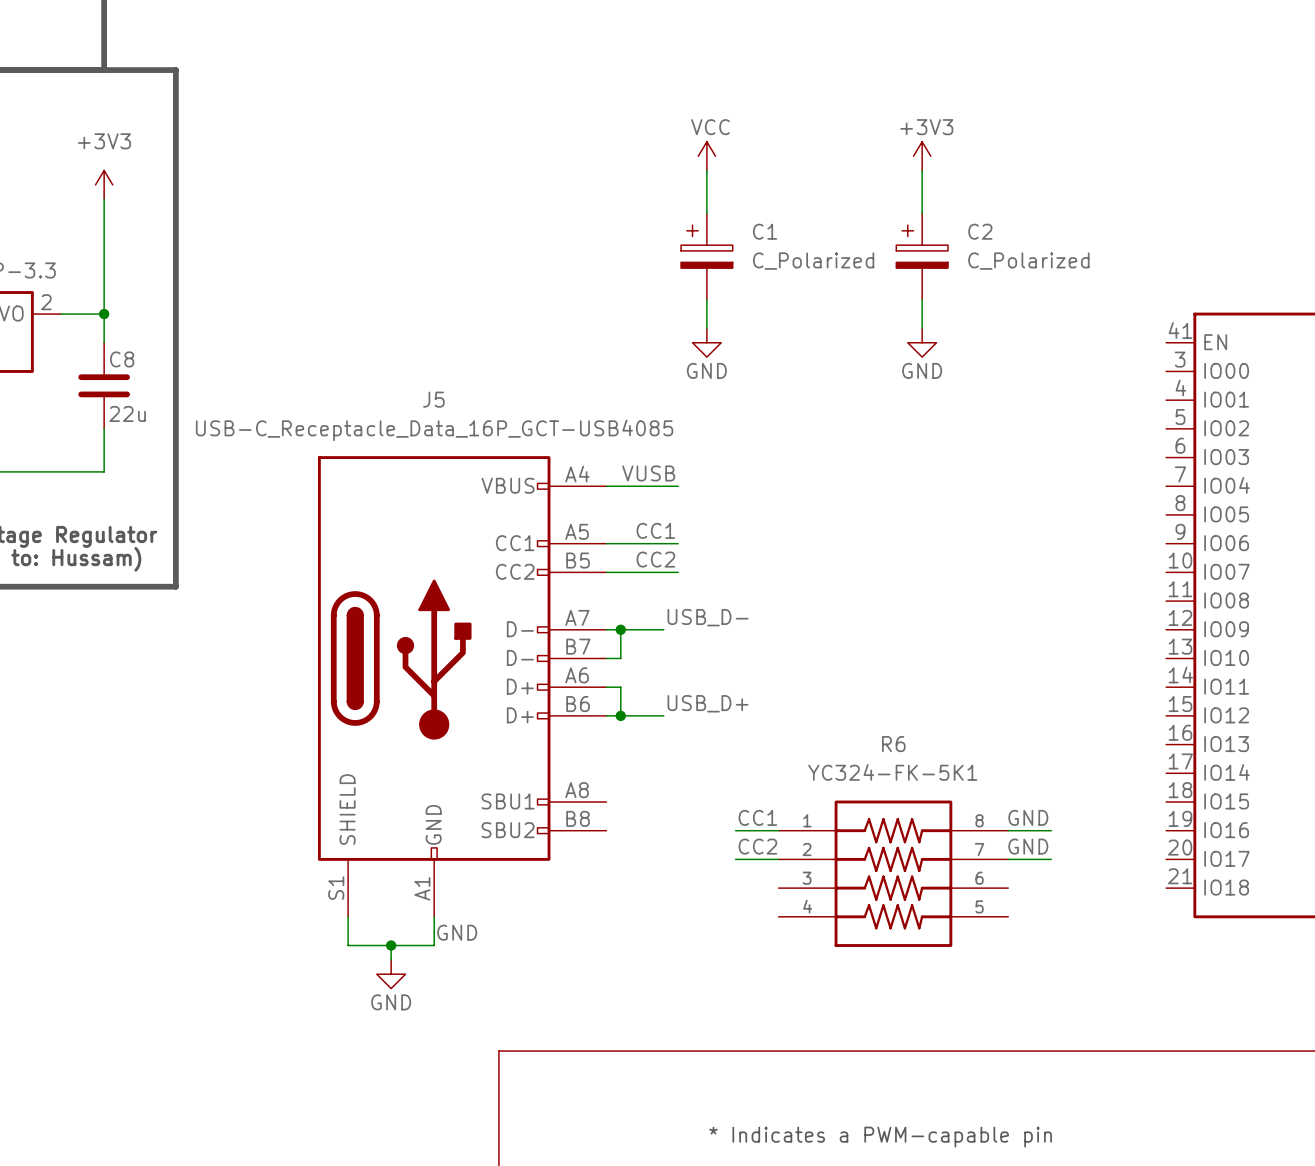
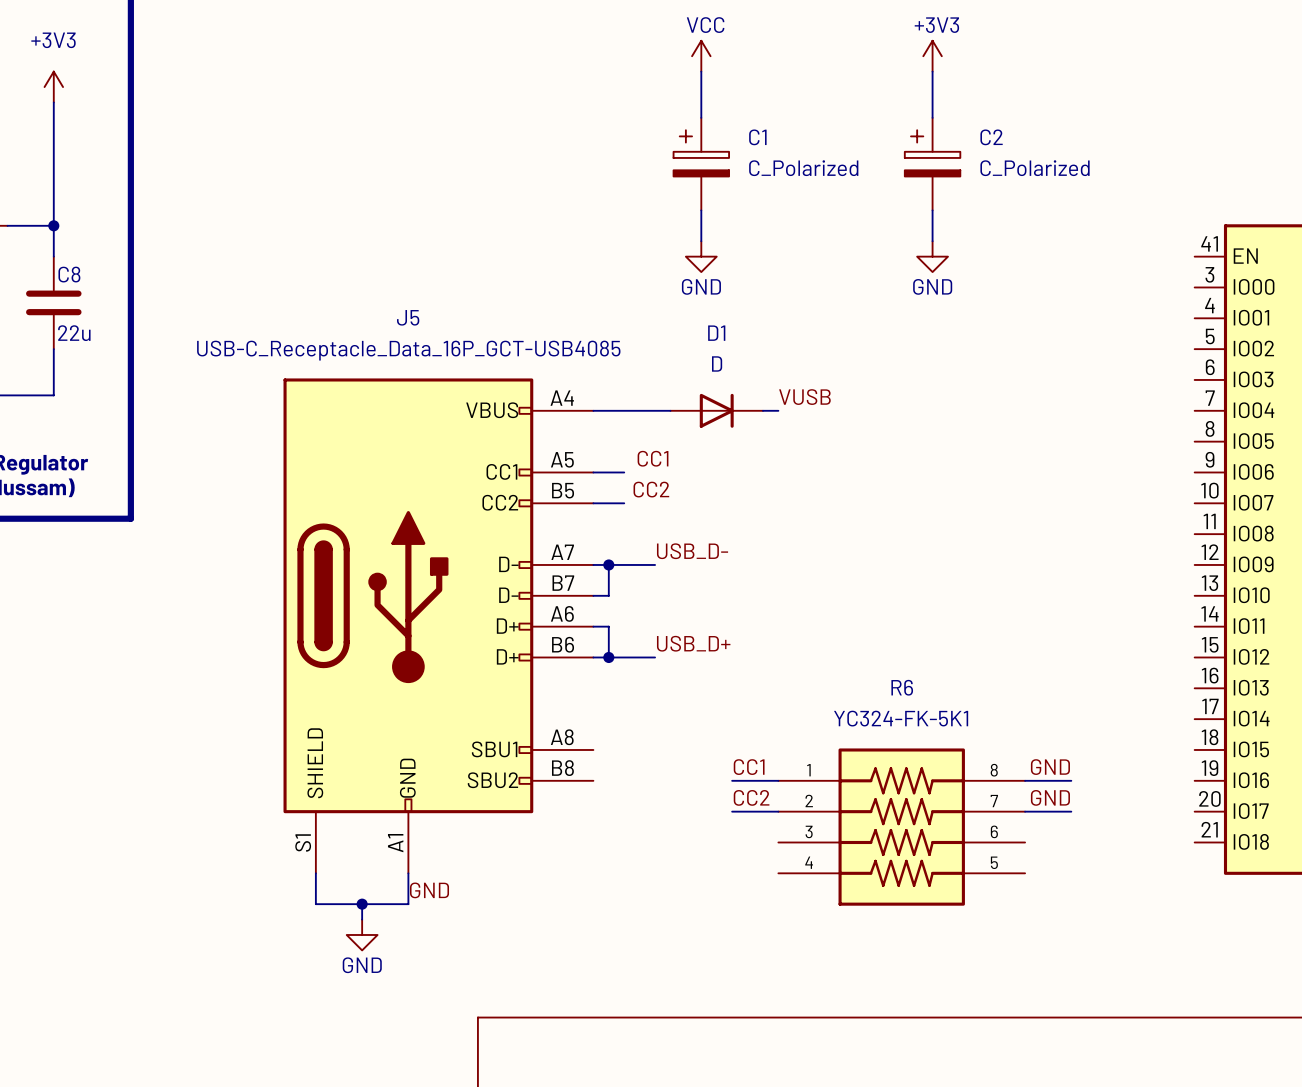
label position: VUSB (648, 473) -> VUSB (804, 397)
D1: none -> D (716, 410)
wire: none -> (762, 410) (778, 410)
wire: (635, 543) (678, 543) -> none
wire: (635, 572) (678, 572) -> none

